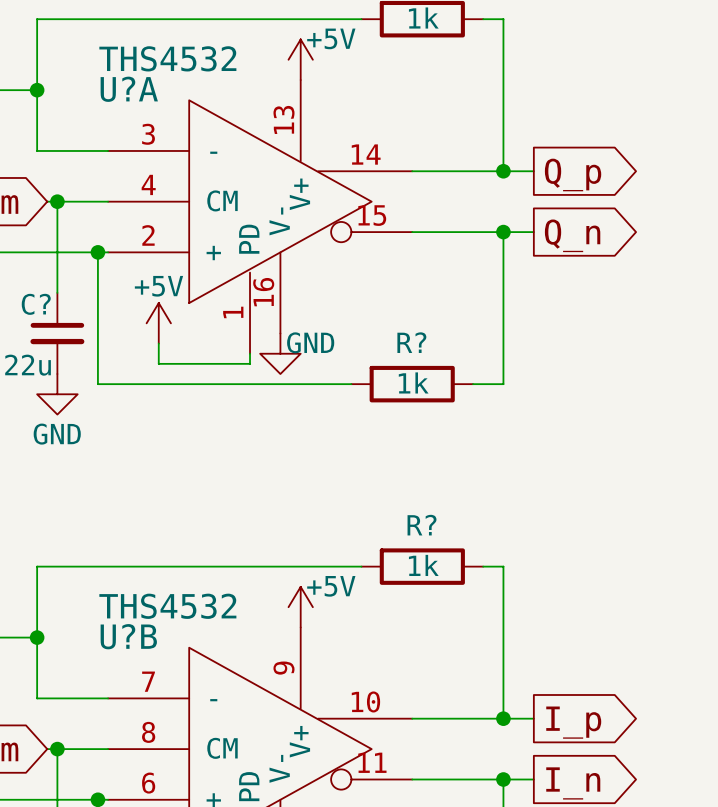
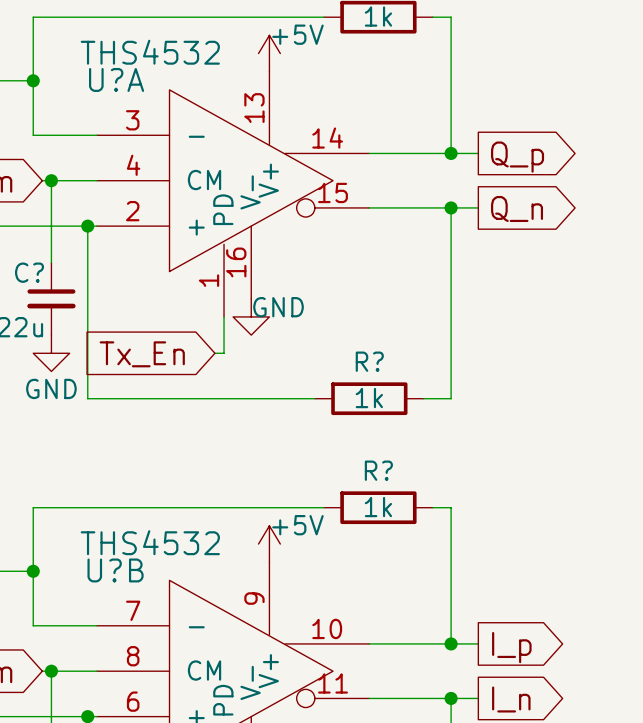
power symbol: +5V (158, 323) -> none
wire: (158, 343) (158, 363) (250, 363) -> (214, 353) (224, 353) (224, 326)
wire: (97, 384) (351, 384) -> (87, 344) (87, 398) (314, 398)
R? position: (412, 384) -> (369, 398)
wire: (473, 384) (503, 384) -> (423, 398) (451, 398) (451, 344)
global label: none -> Tx_En (142, 354)

